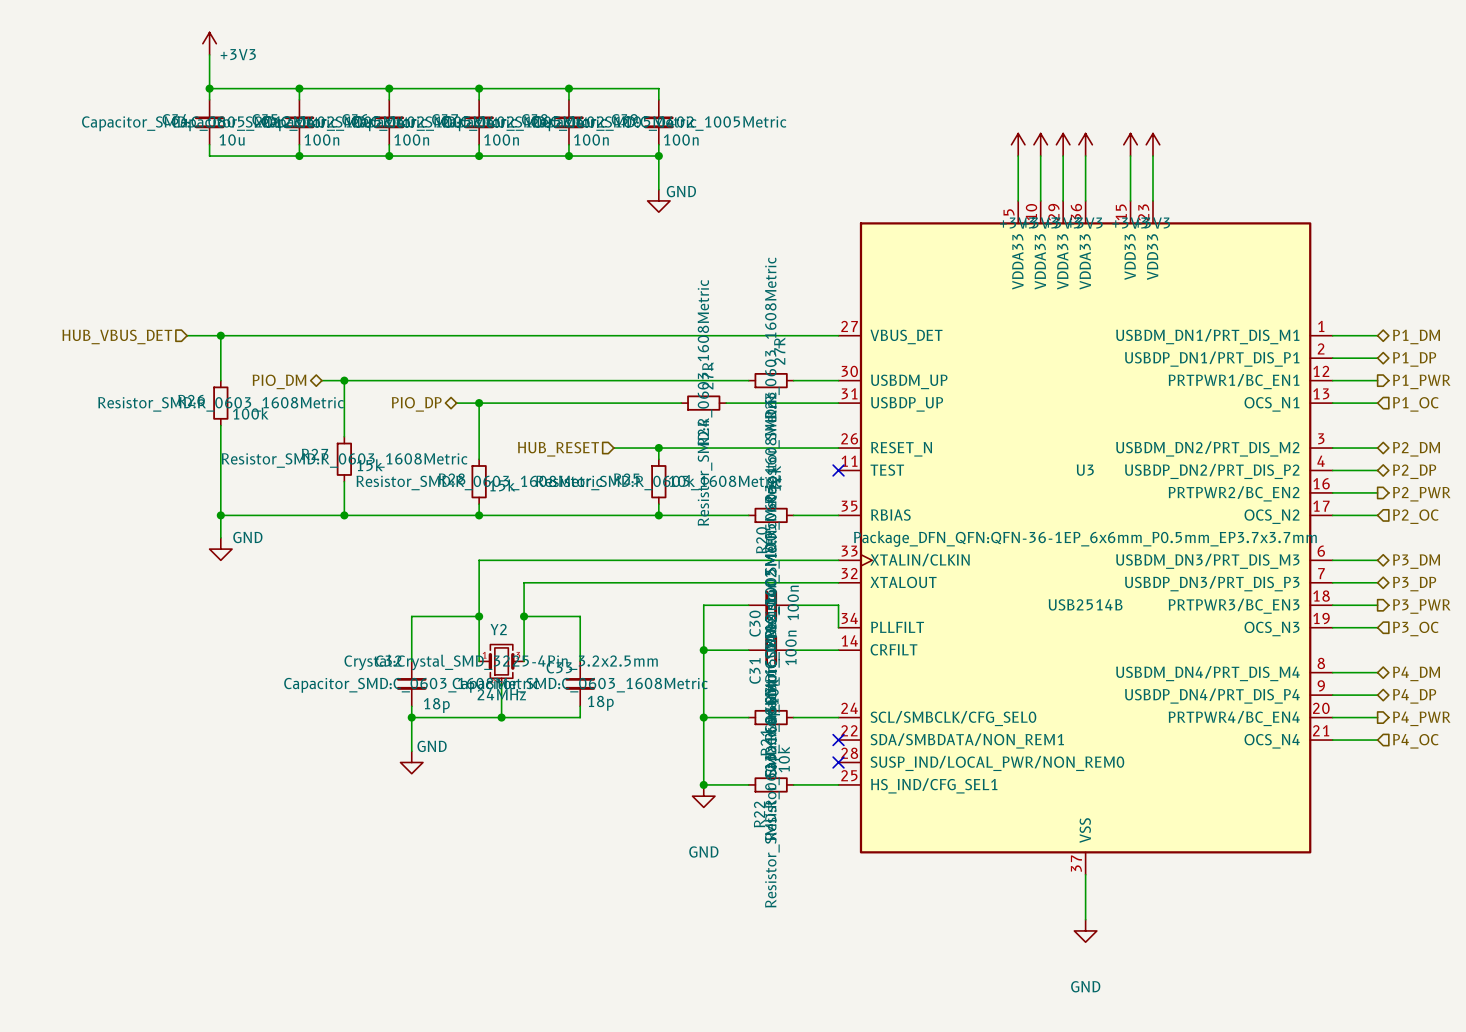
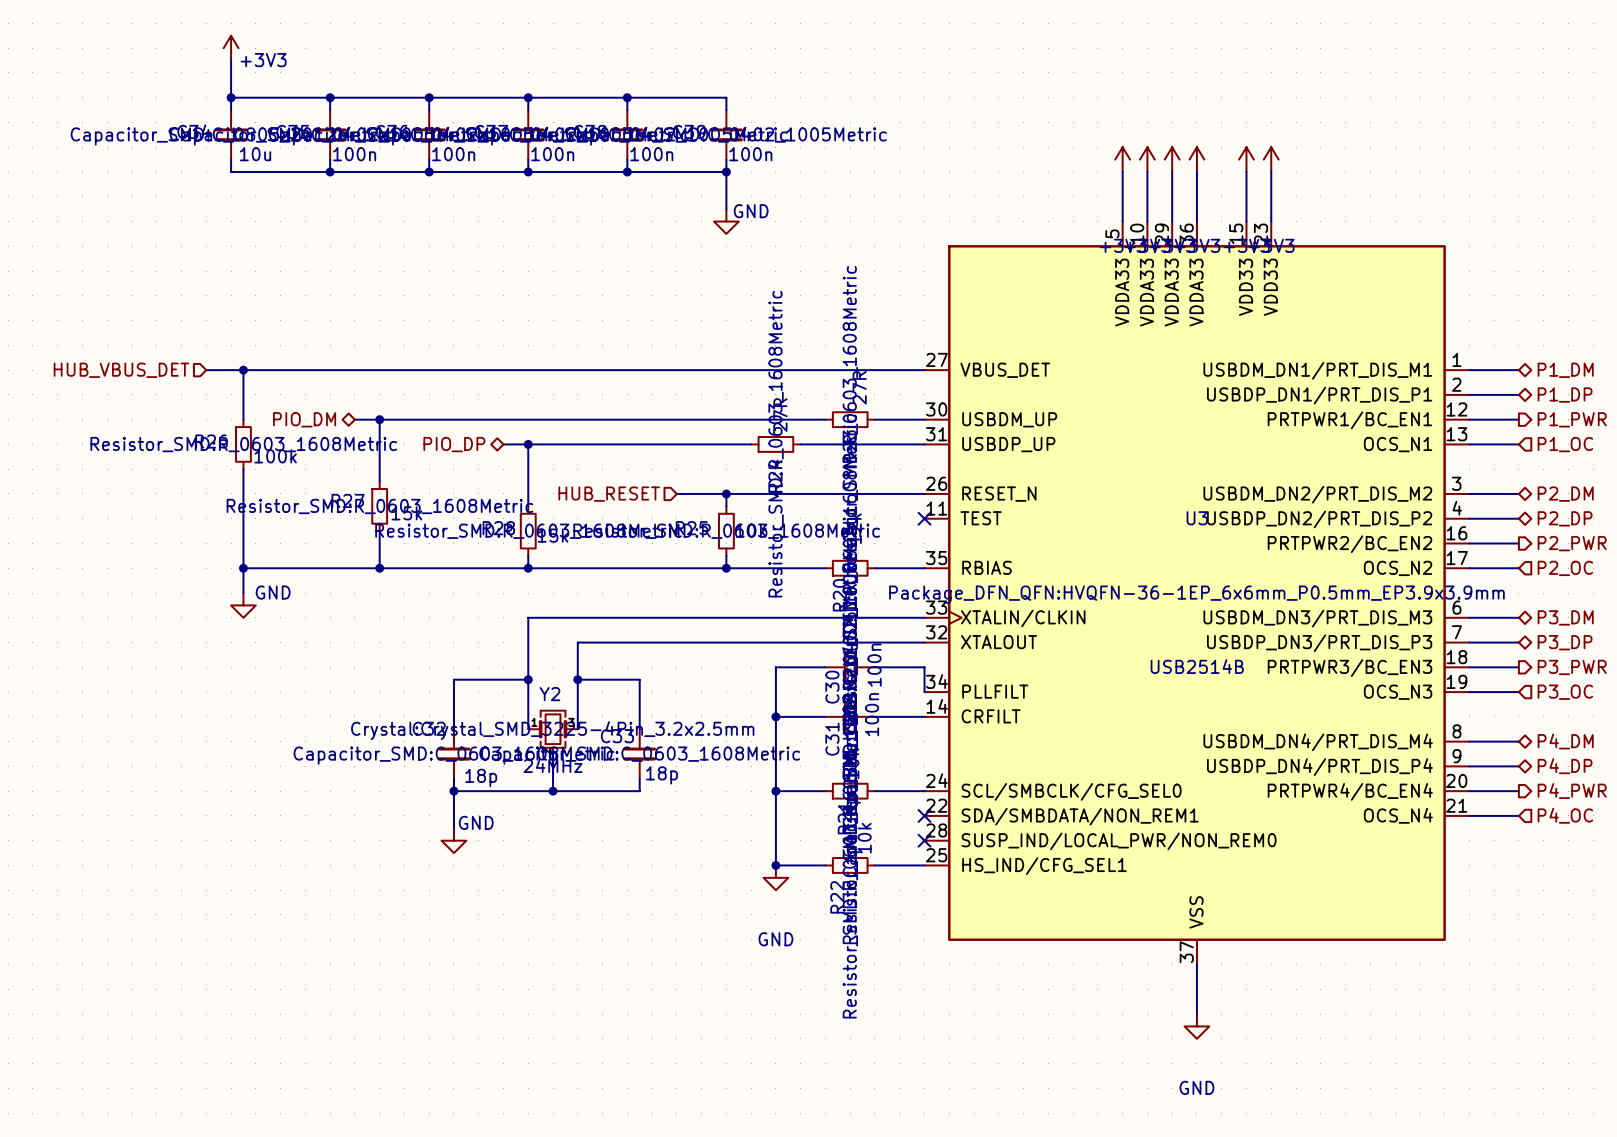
U3 text: Package_DFN_QFN:QFN-36-1EP_6x6mm_P0.5mm_EP3.7x3.7mm (1085, 538) -> Package_DFN_QFN:HVQFN-36-1EP_6x6mm_P0.5mm_EP3.9x3.9mm (1196, 594)

